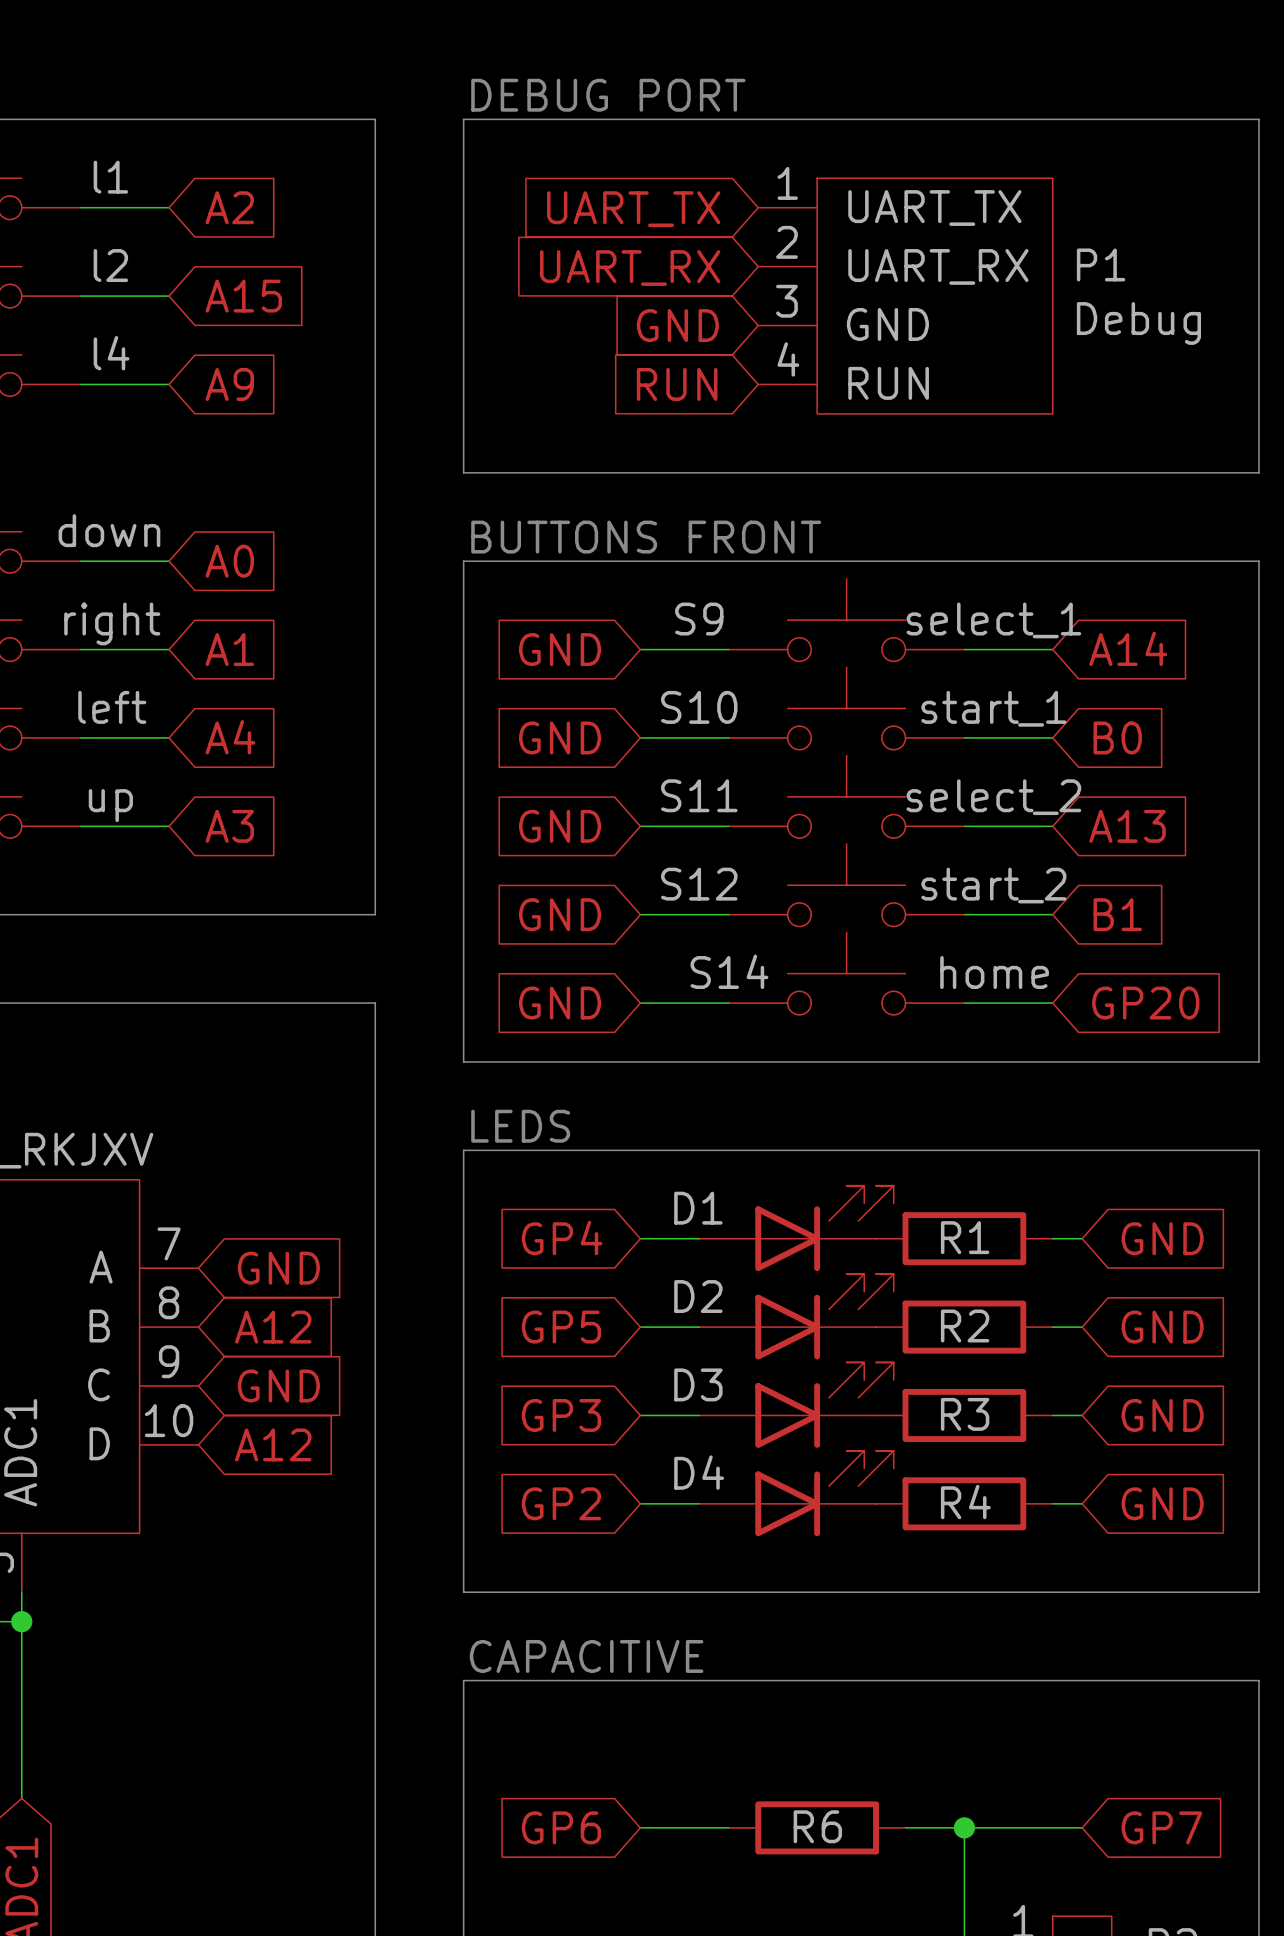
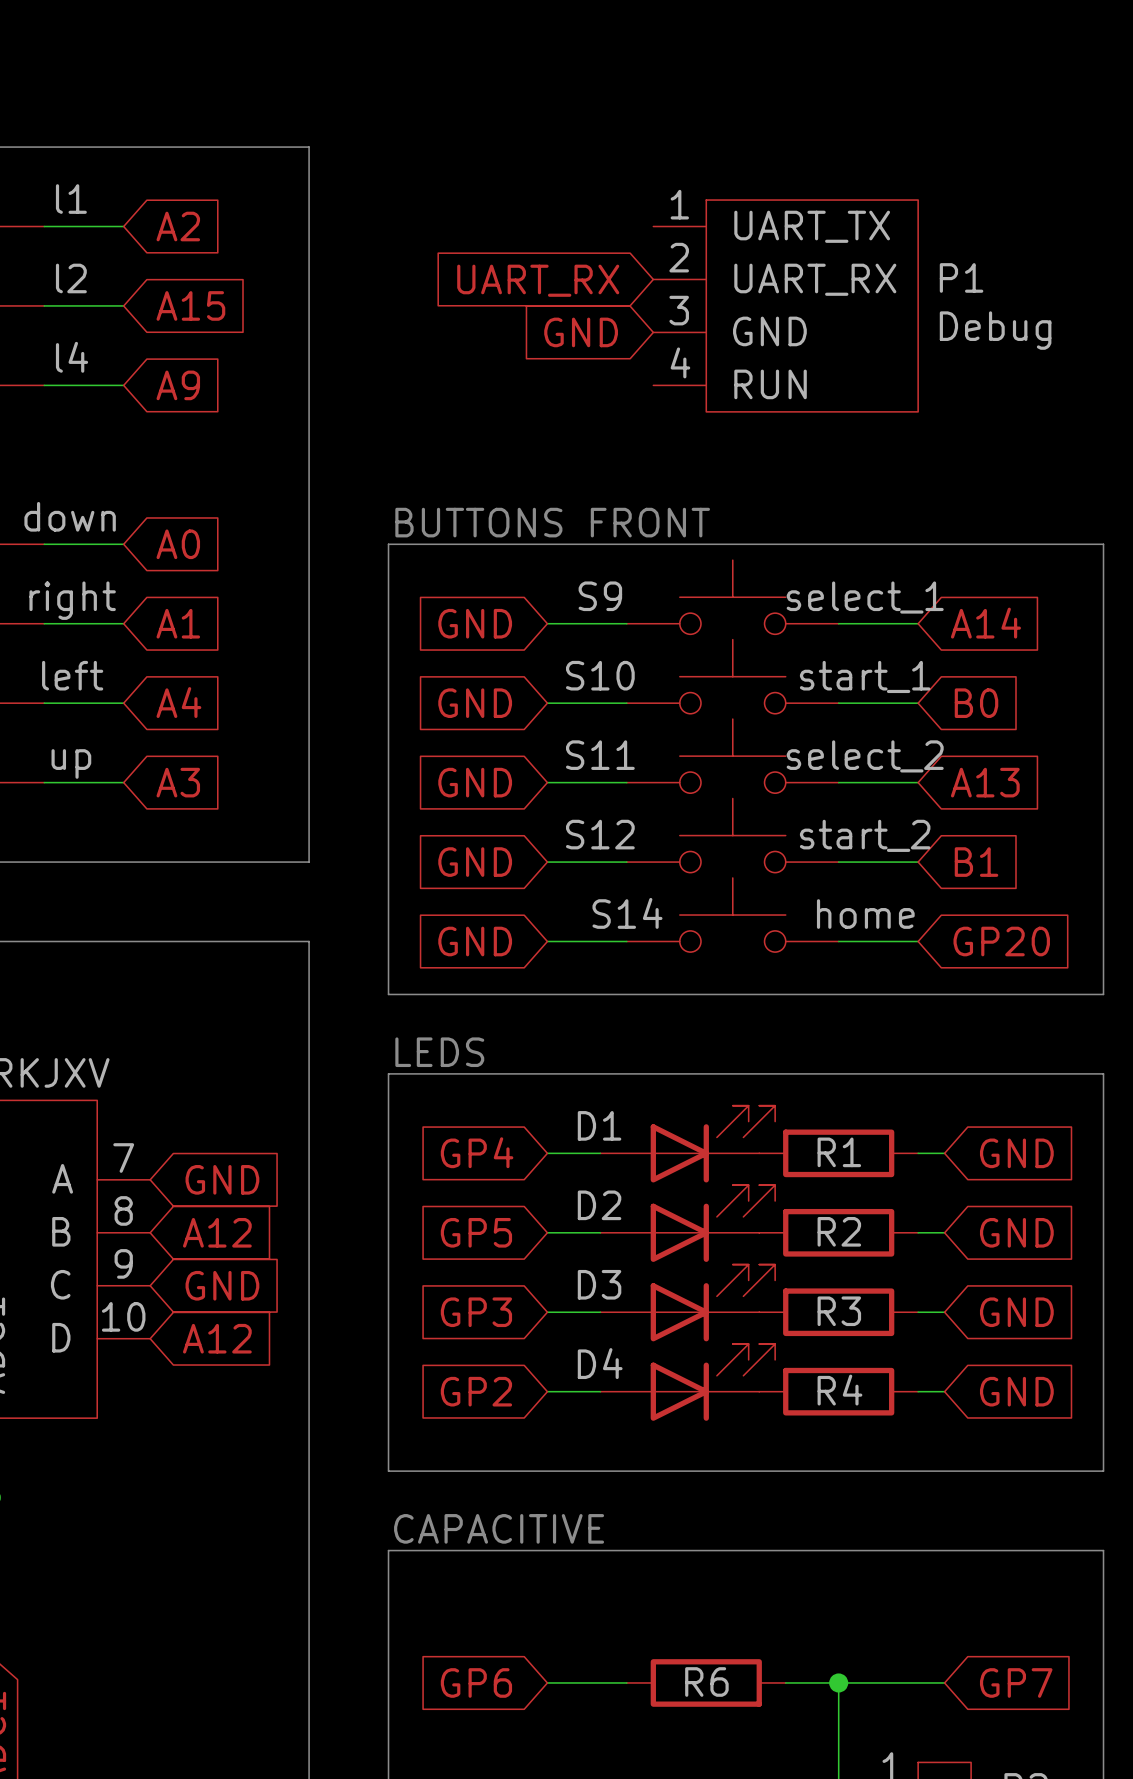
text: DEBUG PORT (608, 95) -> none
line: (463, 119) (463, 472) (1258, 472) (1258, 119) (463, 119) -> none
global label: UART_TX (633, 209) -> none
global label: RUN (677, 384) -> none

